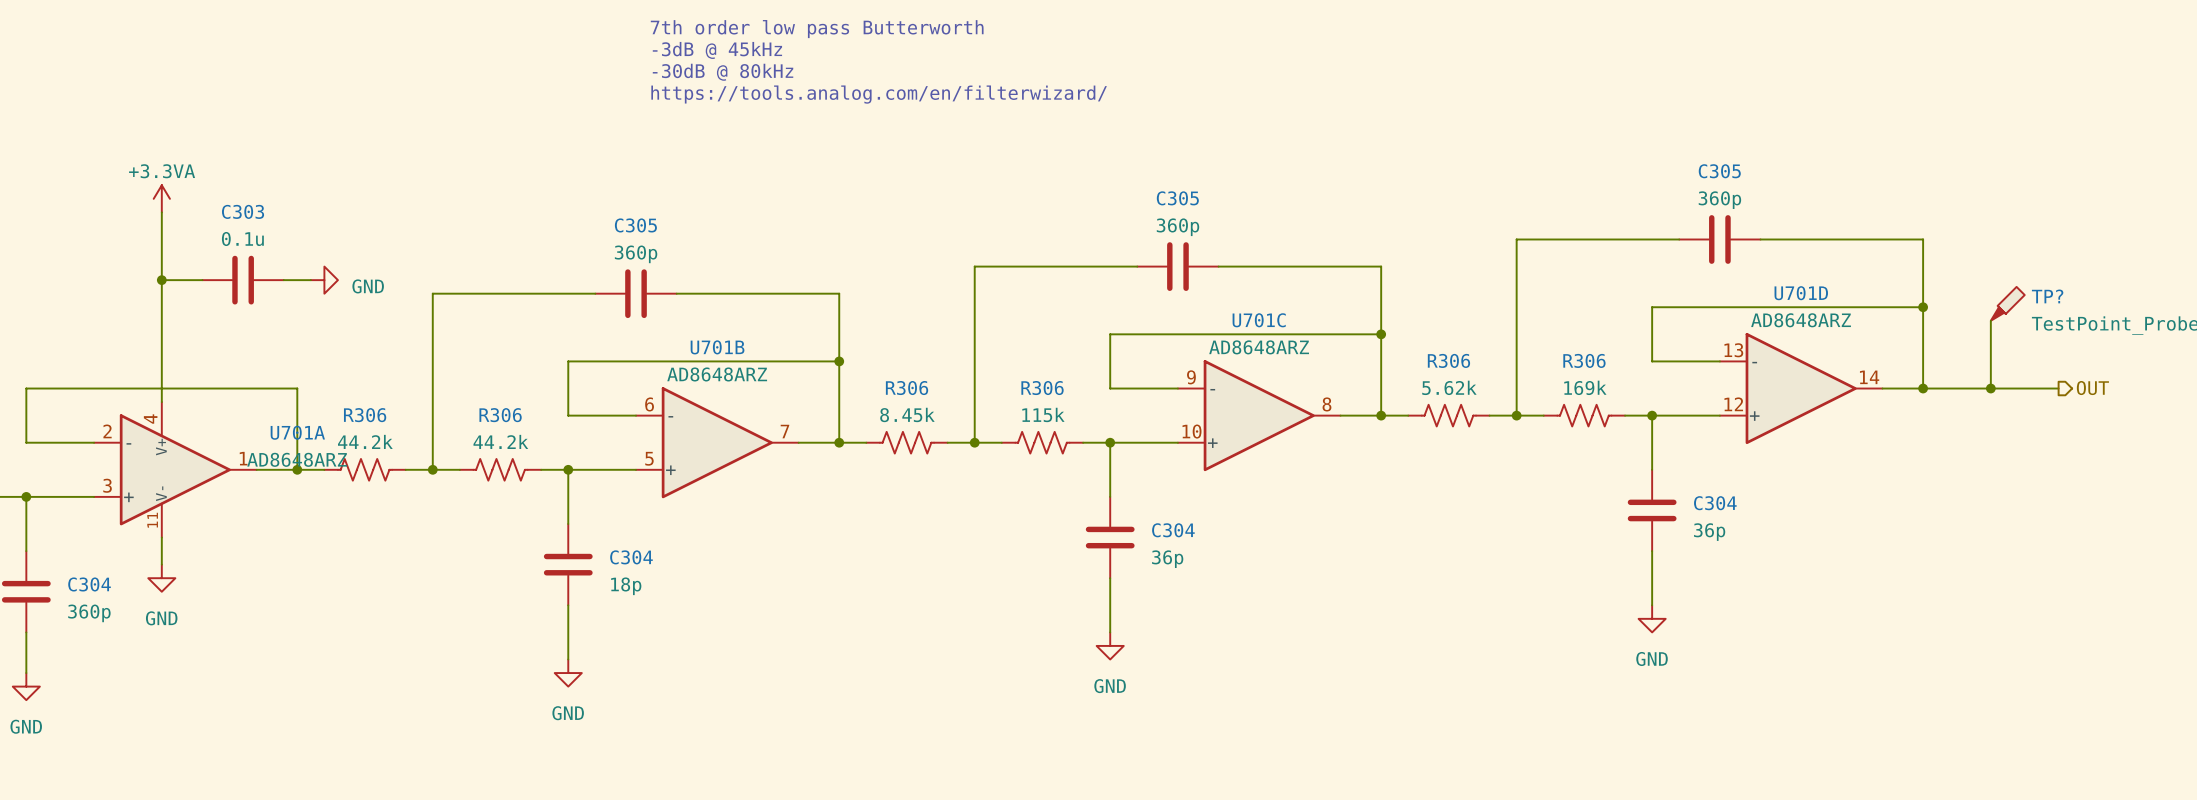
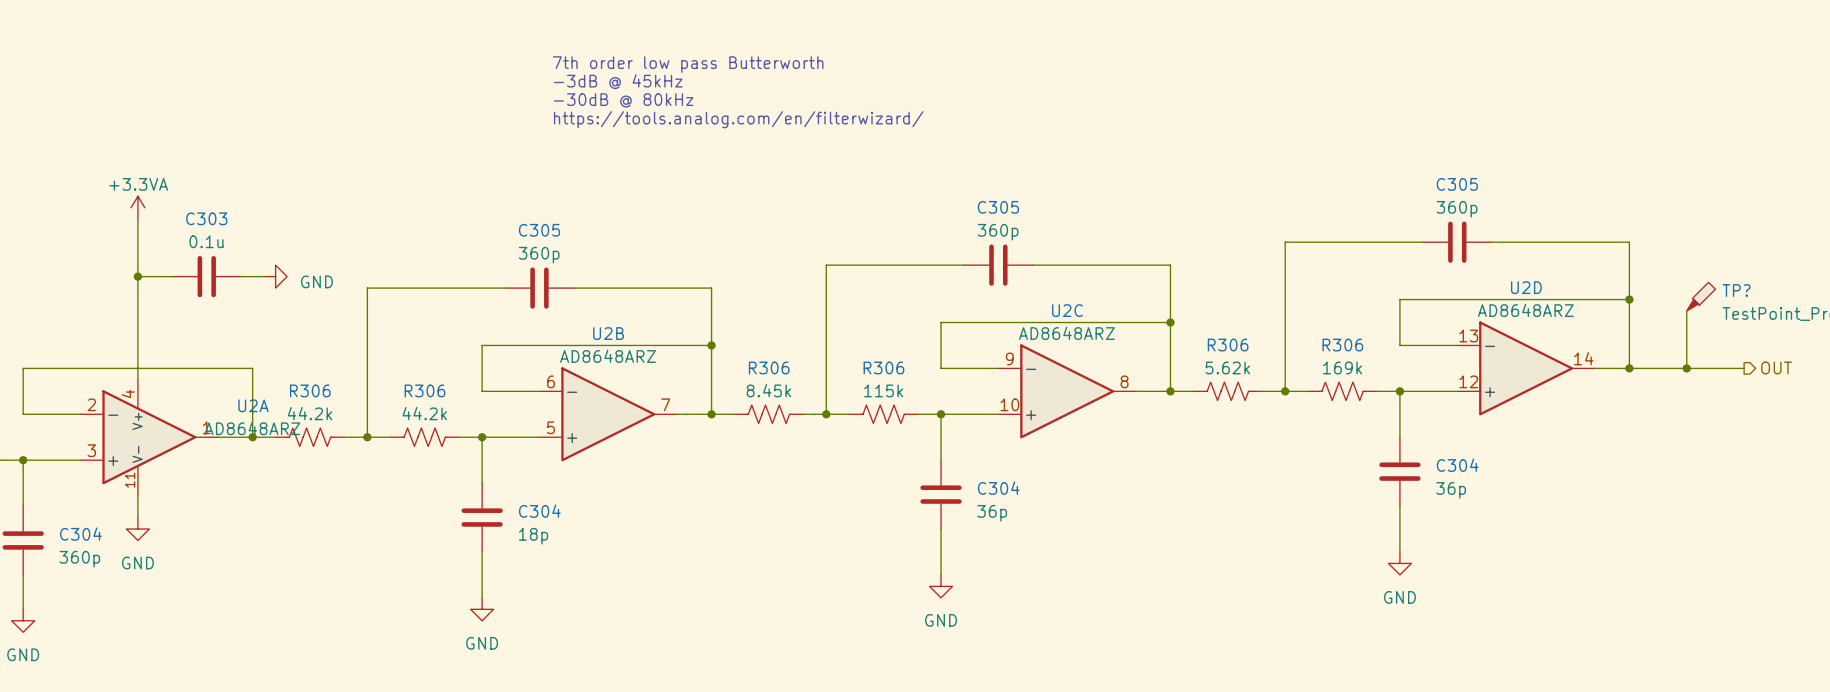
U701D name: U701D (1801, 293) -> U2D (1526, 287)
U701C name: U701C (1259, 320) -> U2C (1067, 310)
U701B name: U701B (717, 347) -> U2B (608, 333)
U701A name: U701A (297, 432) -> U2A (253, 405)

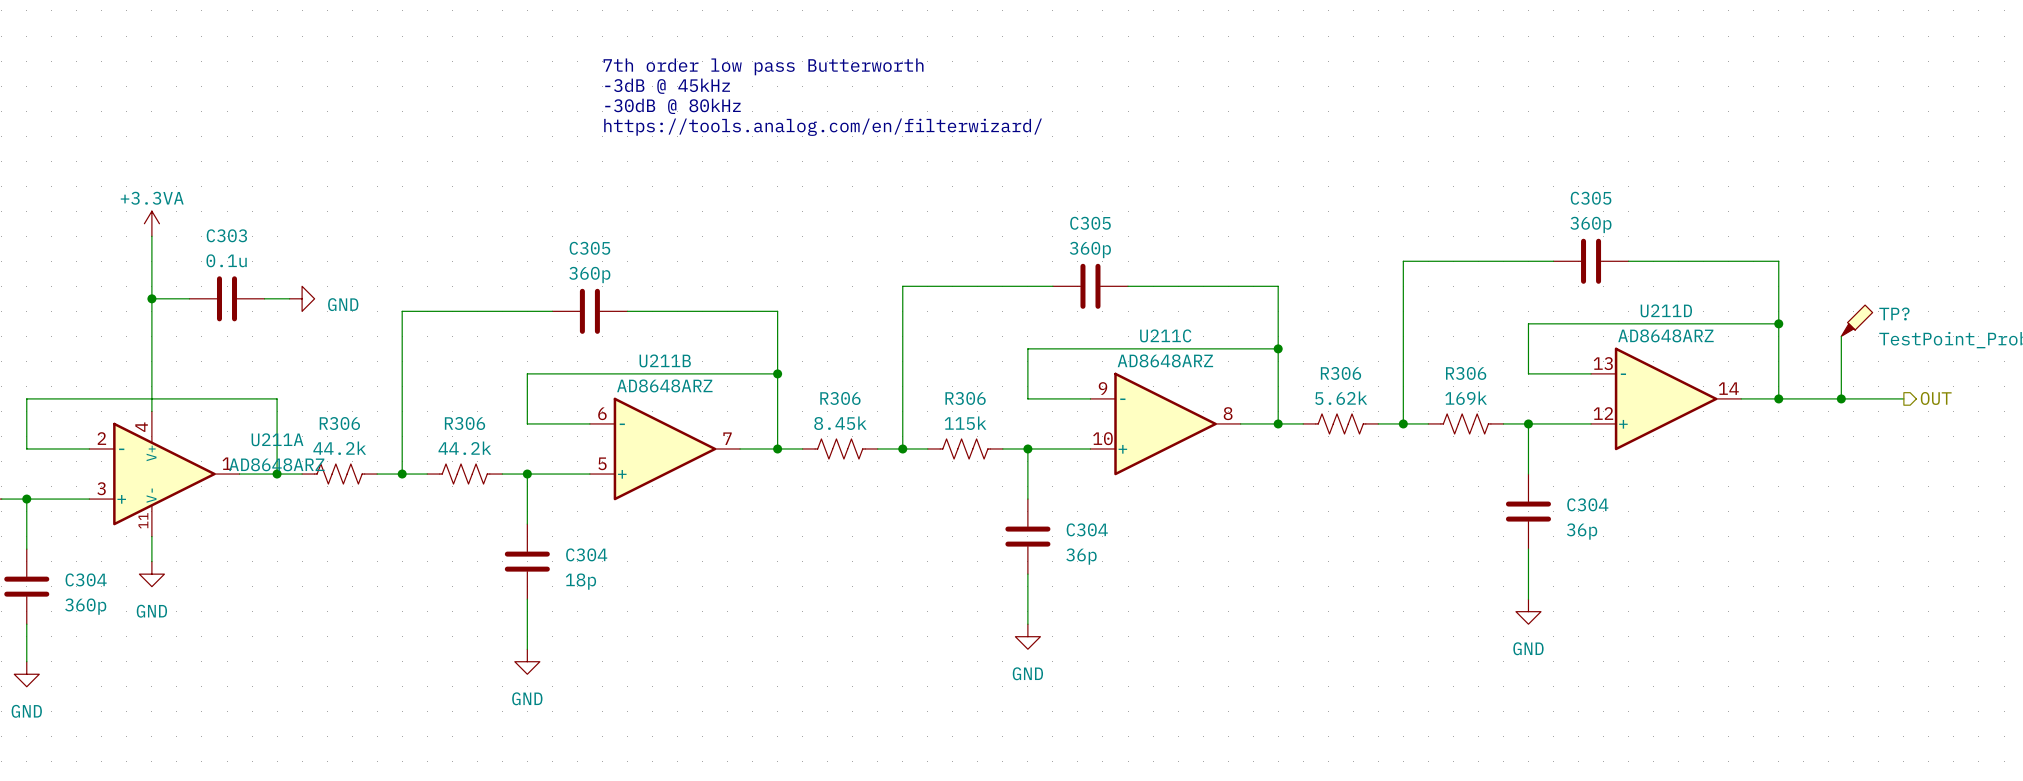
U2D name: U2D (1526, 287) -> U211D (1666, 310)
U2C name: U2C (1067, 310) -> U211C (1165, 335)
U2B name: U2B (608, 333) -> U211B (665, 360)
U2A name: U2A (253, 405) -> U211A (277, 439)

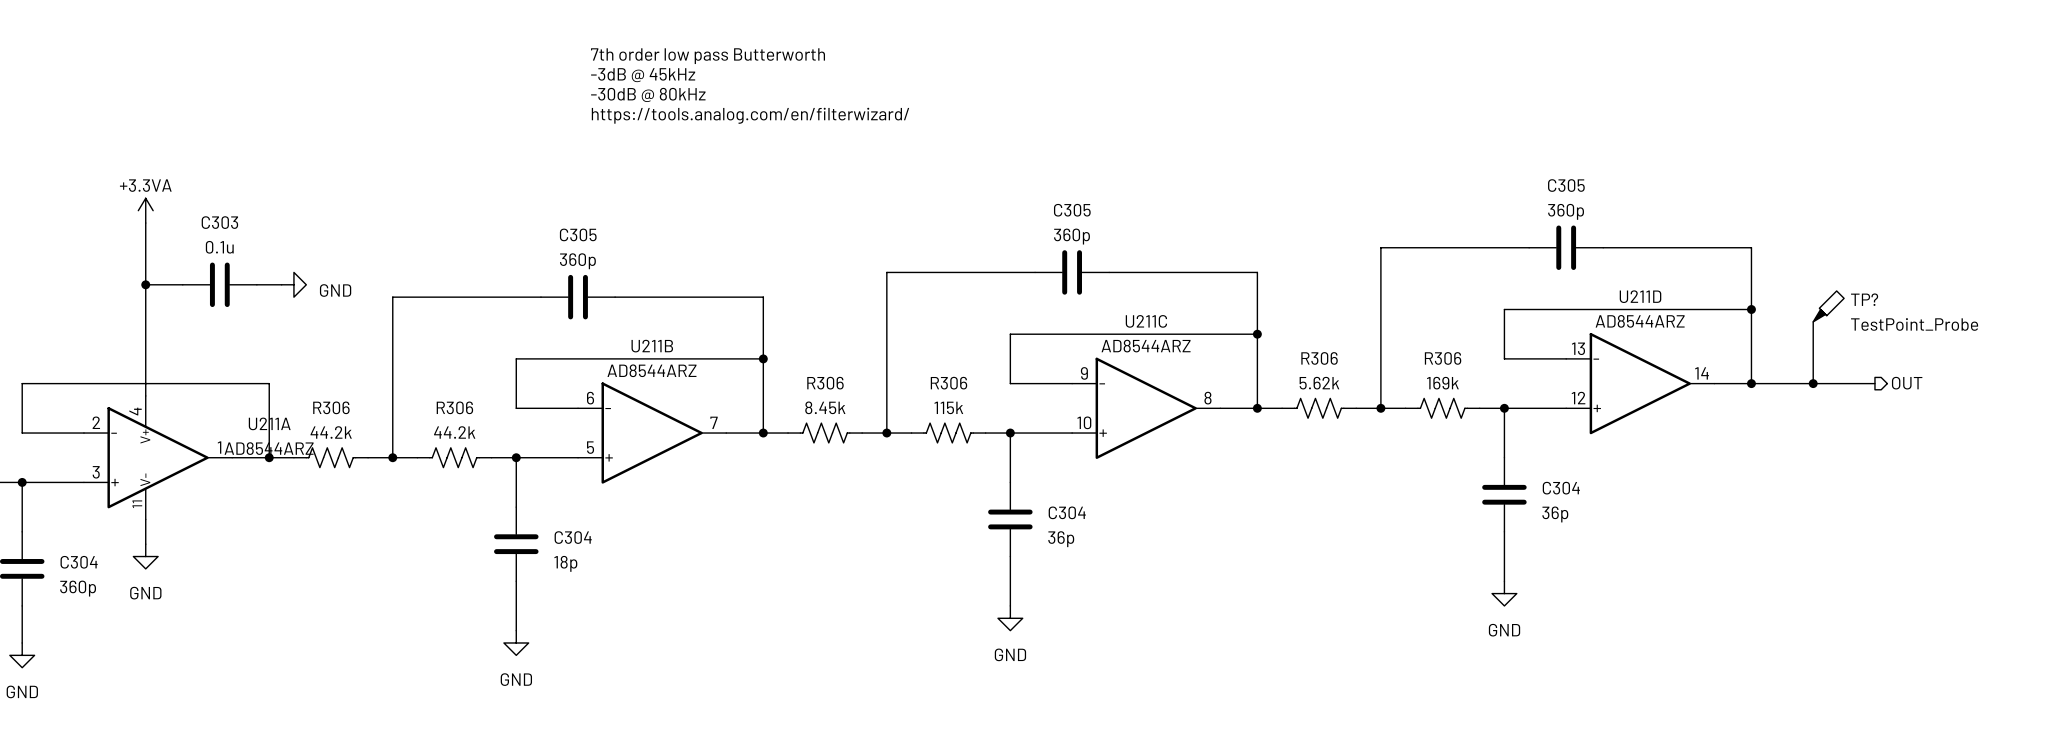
U211D value: AD8648ARZ (1665, 335) -> AD8544ARZ (1640, 321)
U211C value: AD8648ARZ (1165, 360) -> AD8544ARZ (1146, 346)
U211B value: AD8648ARZ (664, 385) -> AD8544ARZ (651, 370)
U211A value: AD8648ARZ (276, 464) -> AD8544ARZ (269, 448)

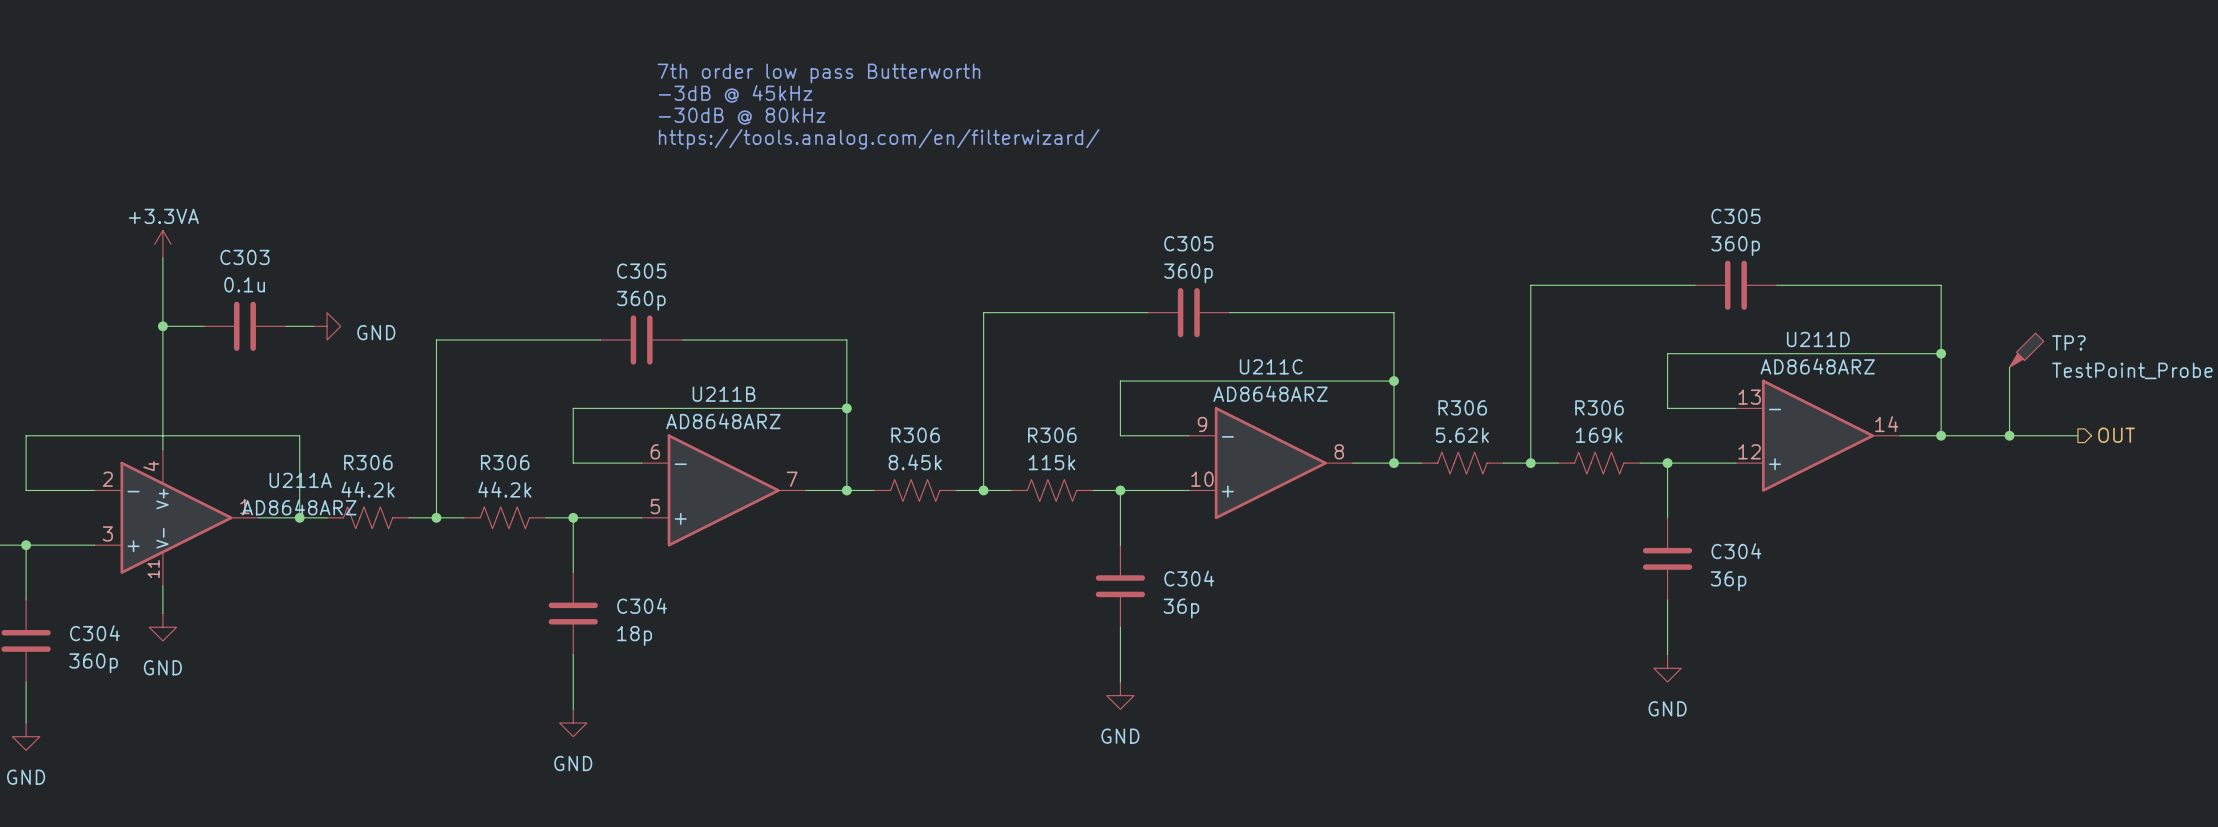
U211D value: AD8544ARZ (1640, 321) -> AD8648ARZ (1817, 366)
U211C value: AD8544ARZ (1146, 346) -> AD8648ARZ (1270, 393)
U211B value: AD8544ARZ (651, 370) -> AD8648ARZ (723, 421)
U211A value: AD8544ARZ (269, 448) -> AD8648ARZ (299, 507)

